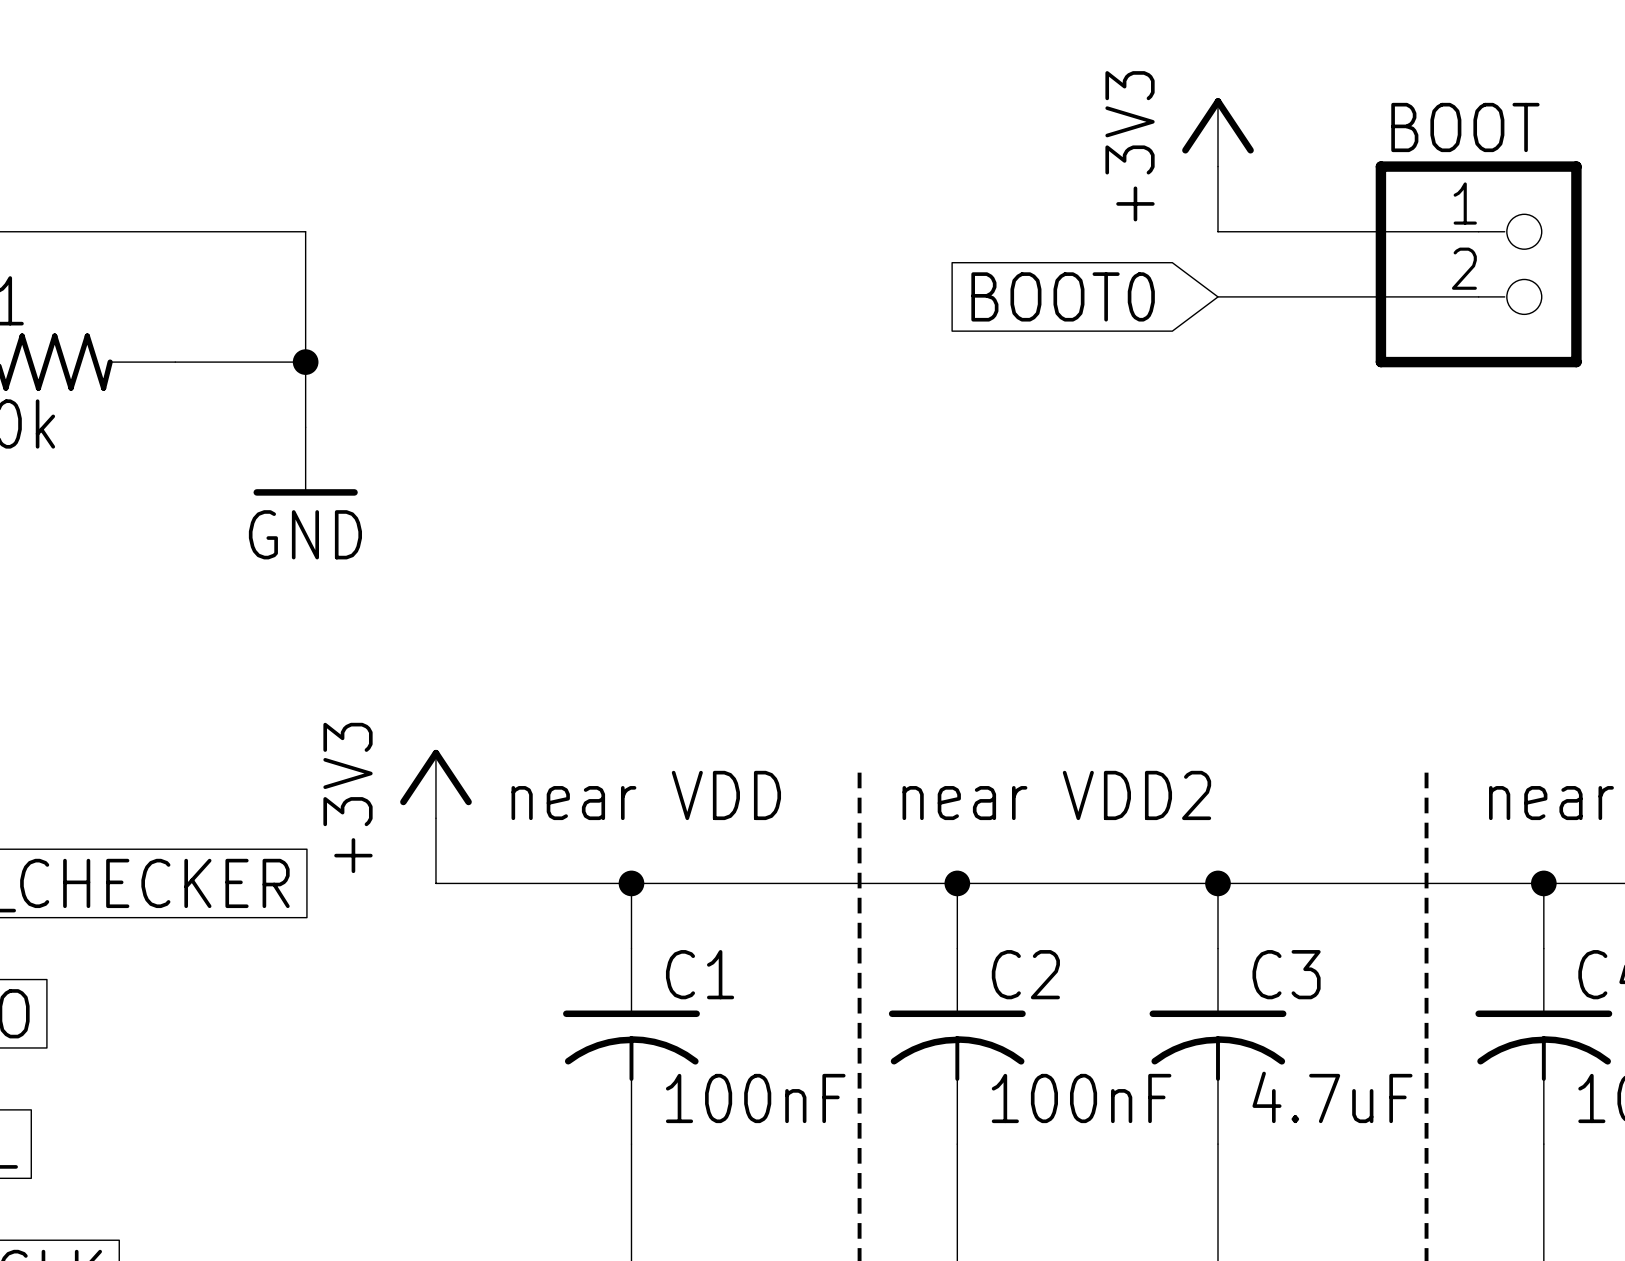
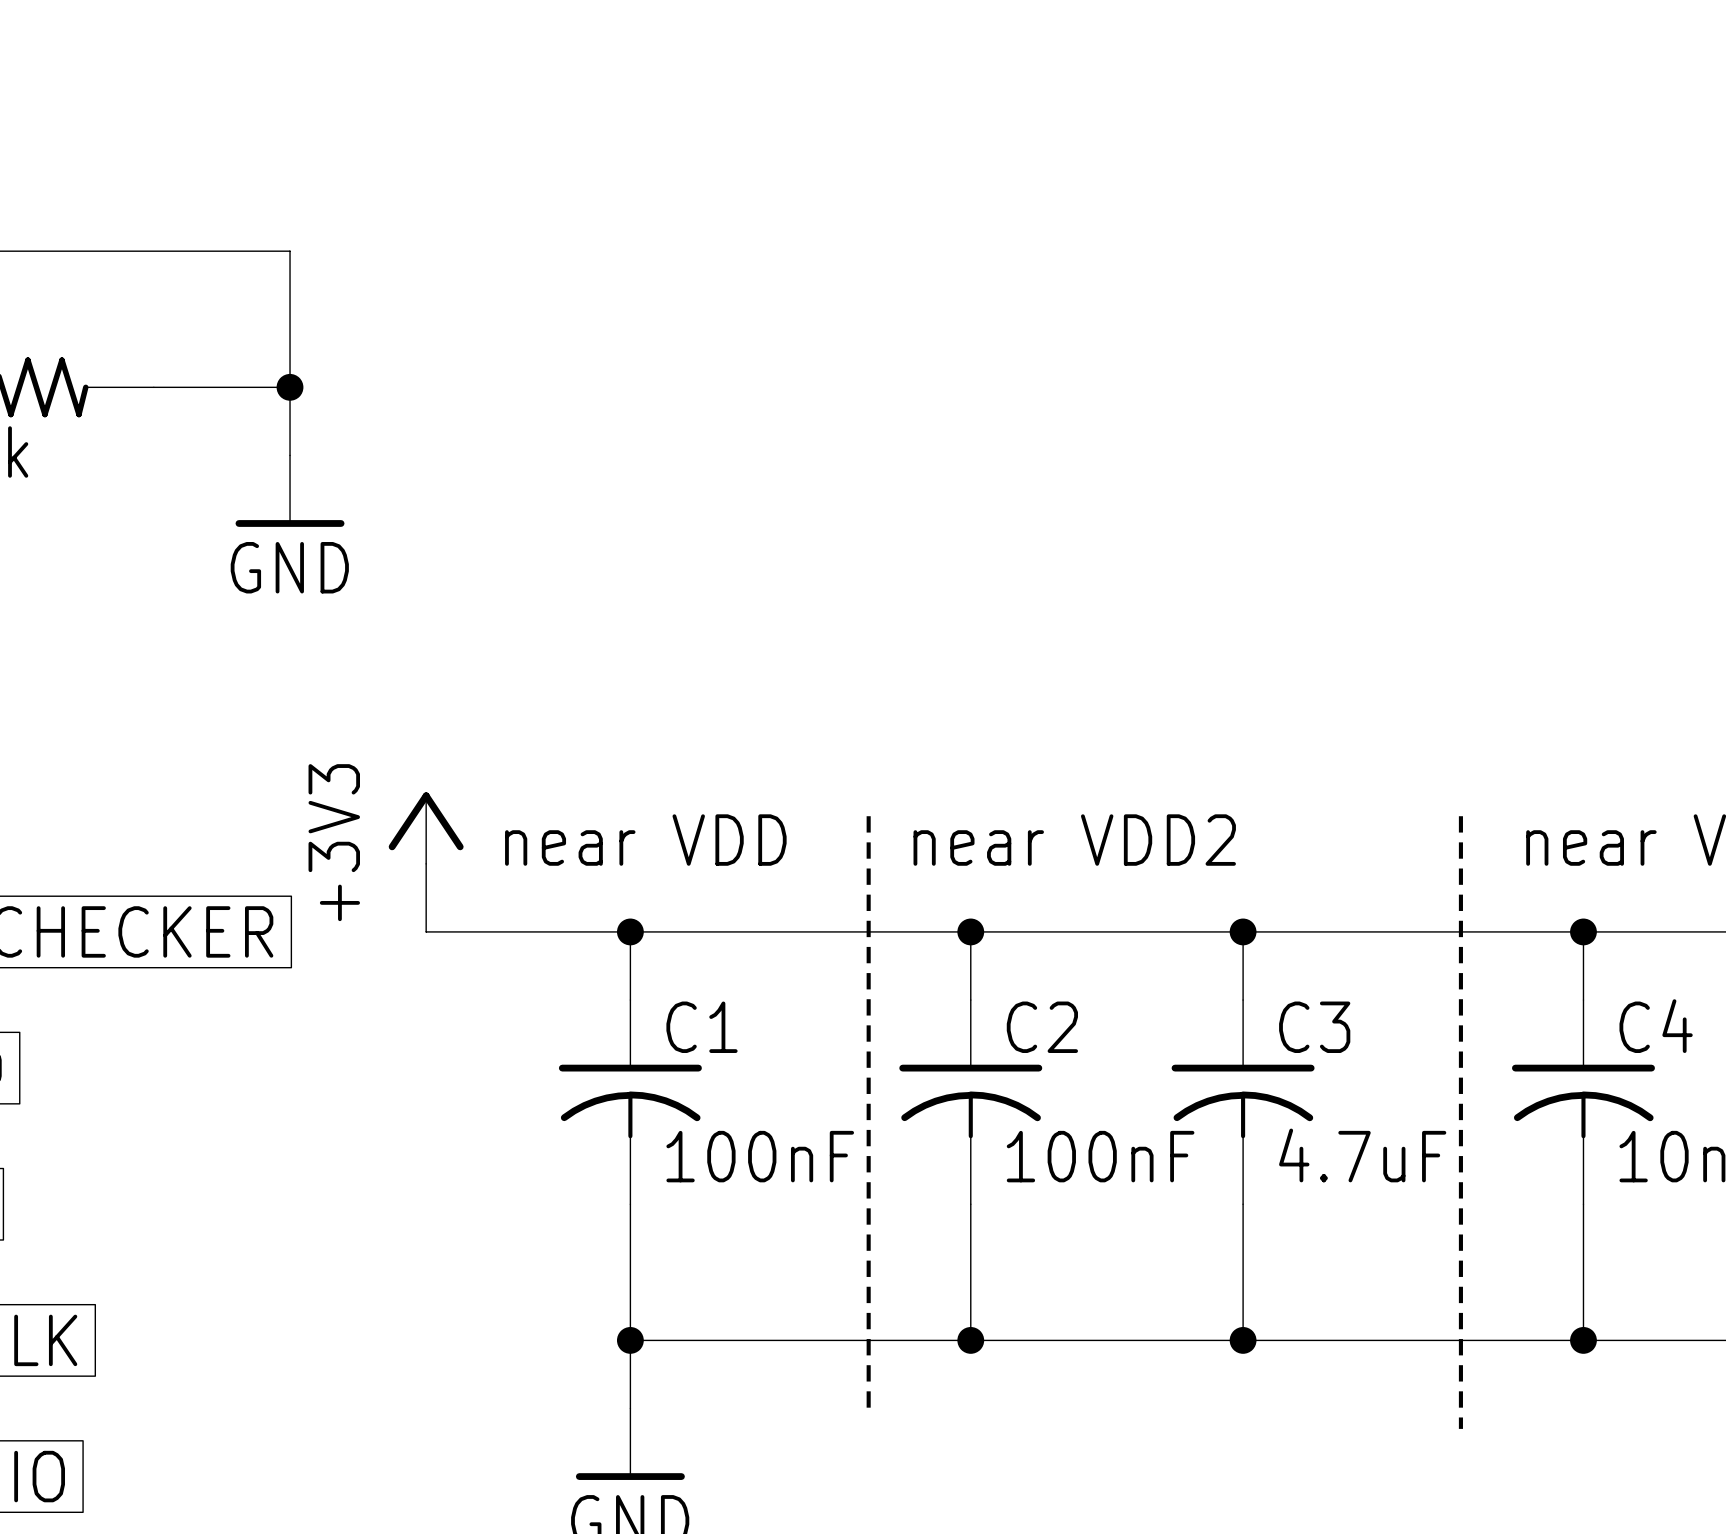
power symbol: +3V3 (1217, 132) -> none
wire: (1217, 166) (1217, 231) (1478, 231) -> none
BOOT: (1478, 264) -> none
global label: BOOT0 (1063, 296) -> none
wire: (1217, 296) (1478, 296) -> none

